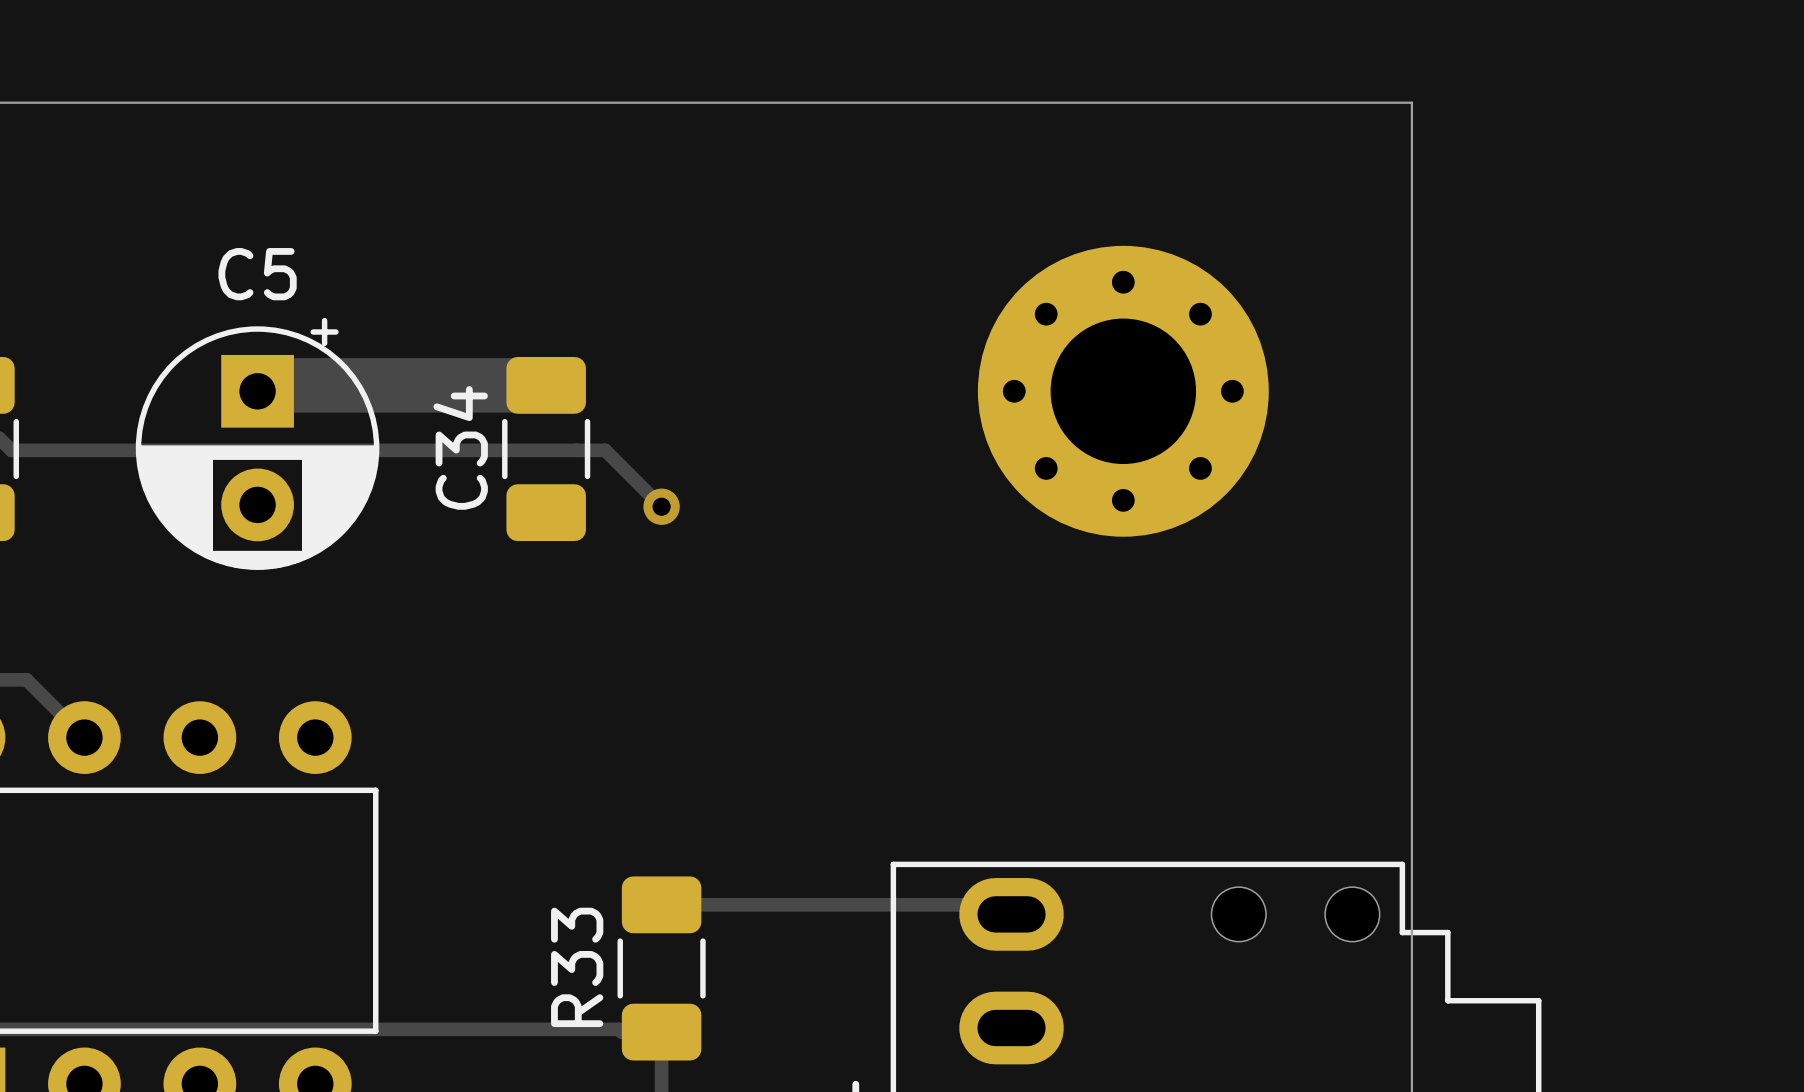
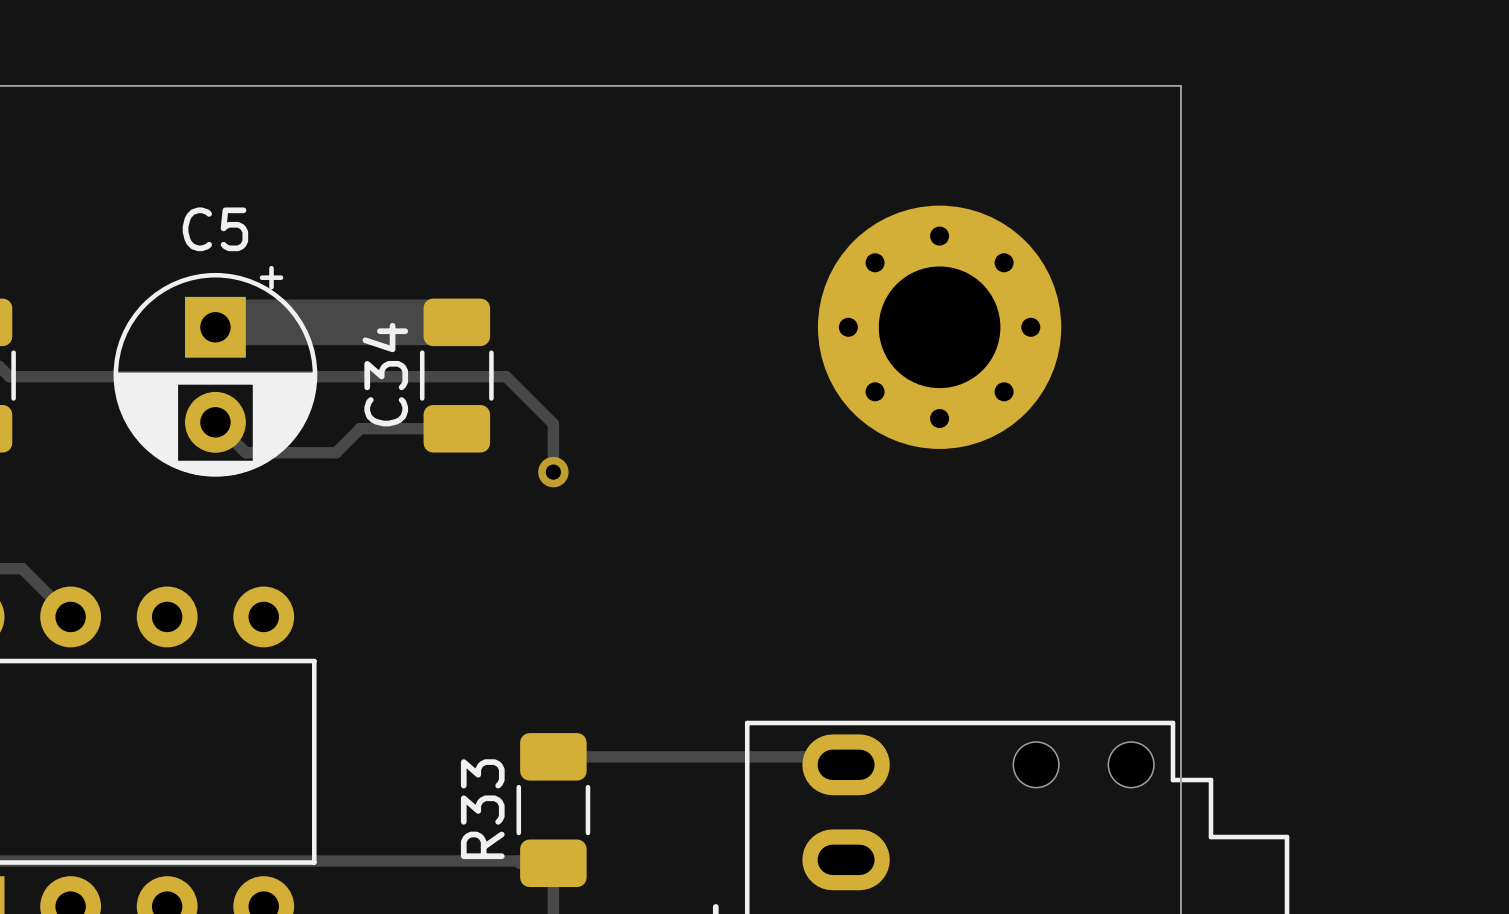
track: none -> (215, 422) (245, 452) (336, 452) (360, 428) (456, 428)
track: none -> (553, 423) (553, 472)
via position: (661, 506) -> (553, 472)

